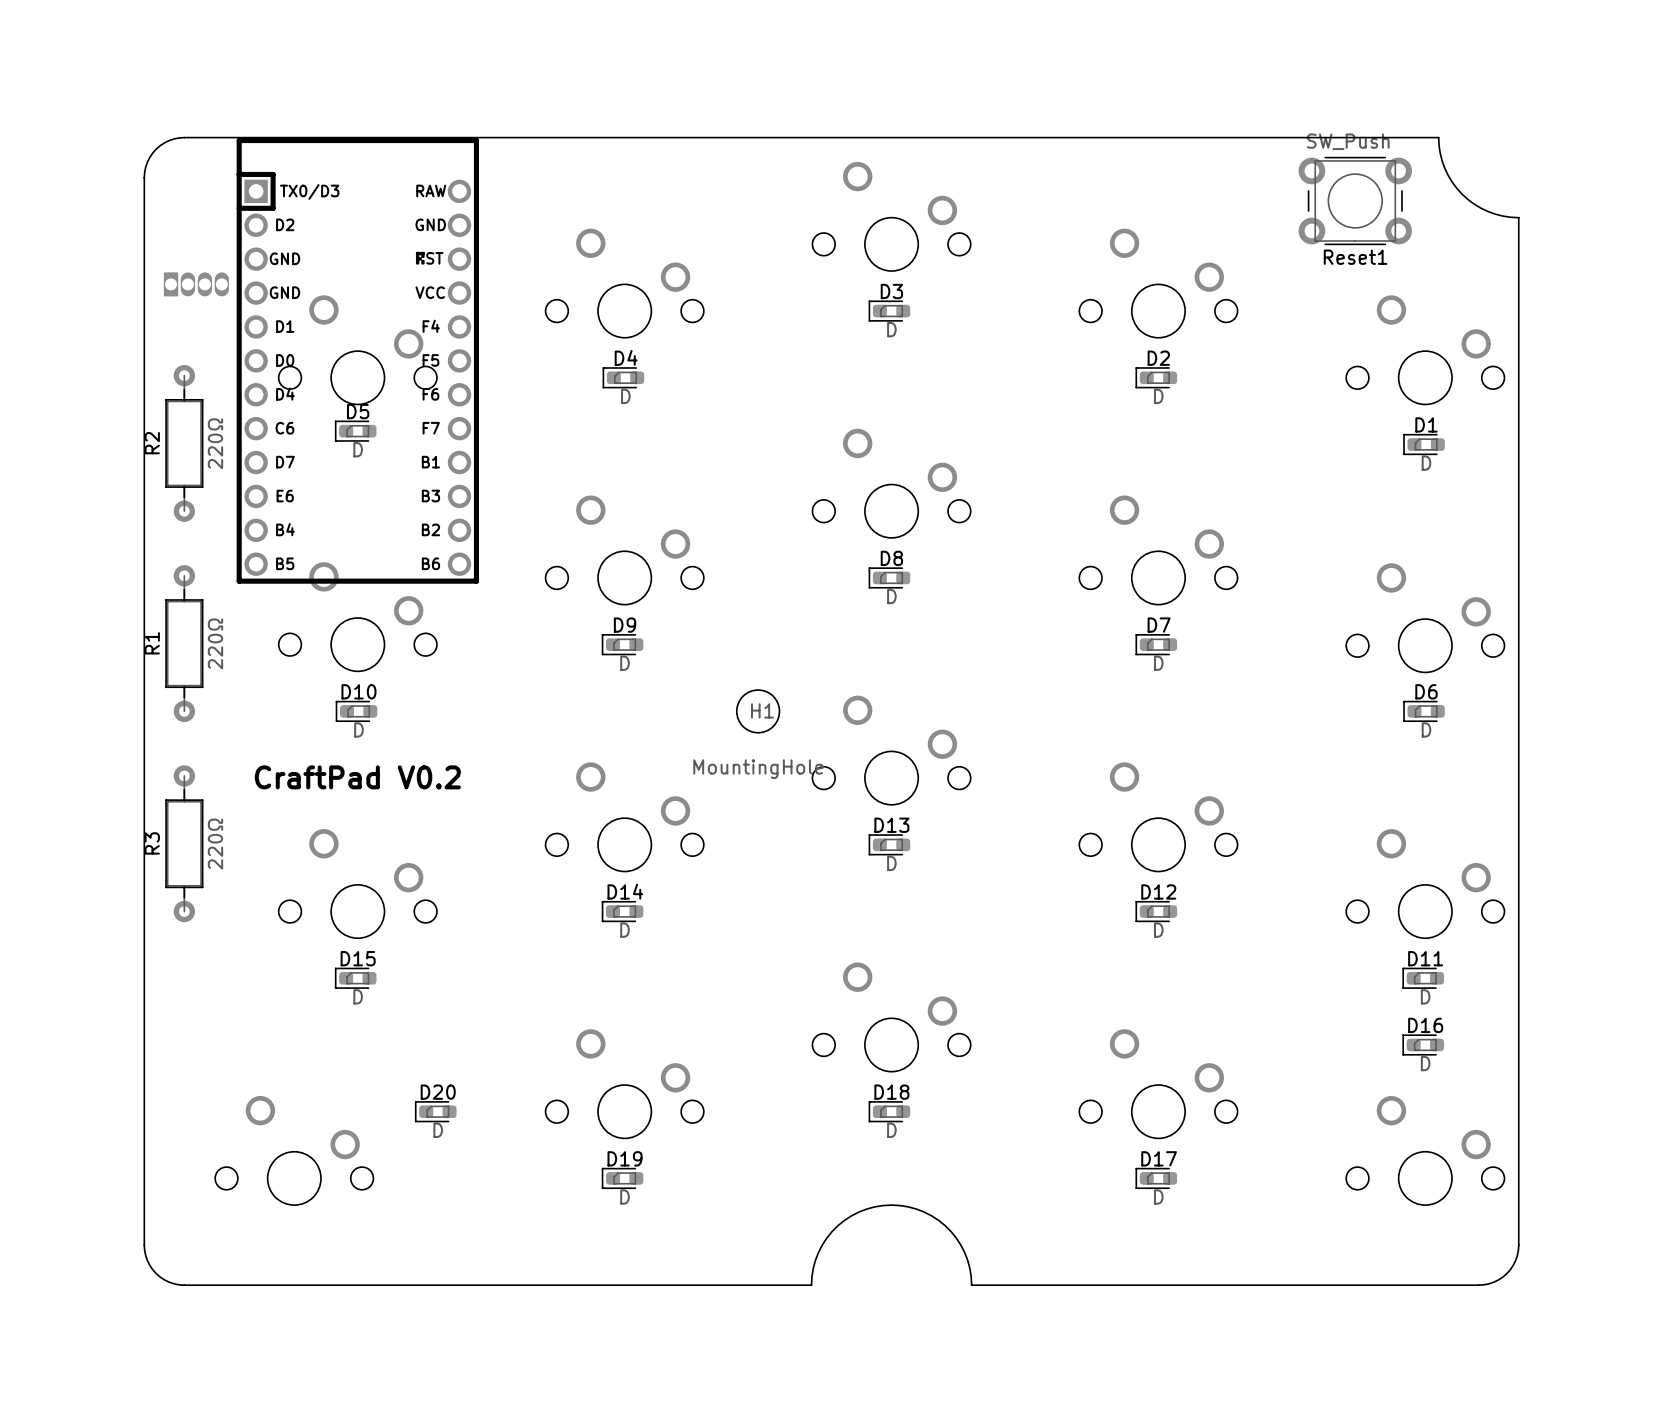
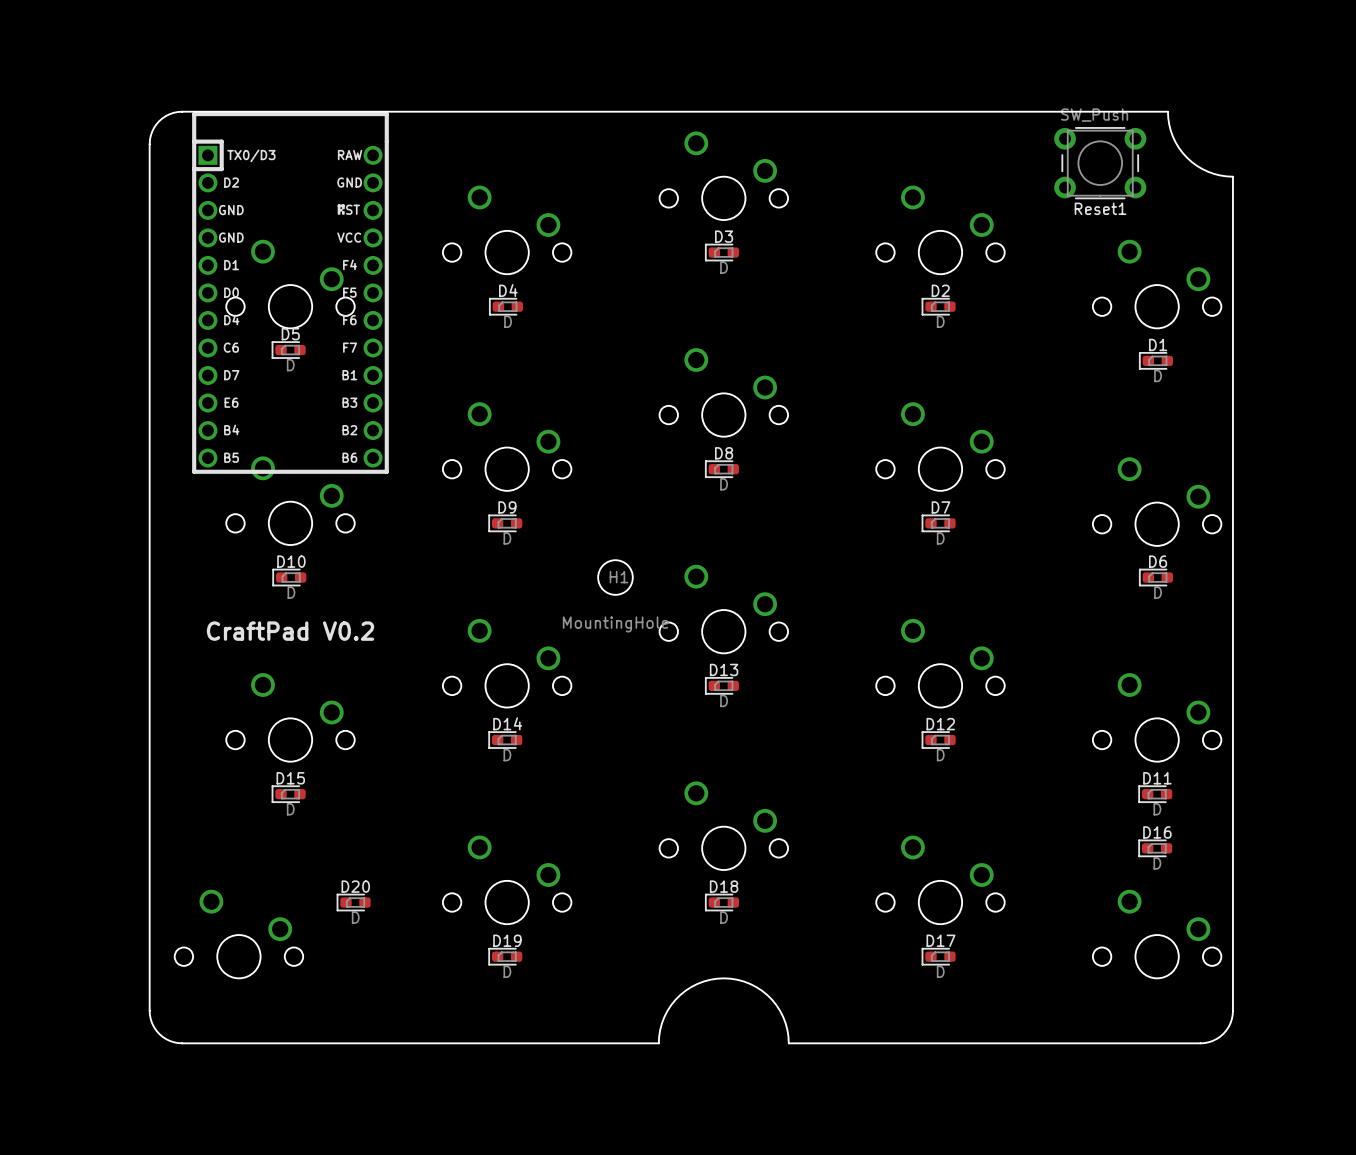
board edge: (224, 137) (179, 137) (164, 142) (149, 157) (144, 177) (144, 1250) (152, 1269) (169, 1282) (184, 1285) (224, 1285) -> (182, 111) (169, 114) (159, 121) (152, 131) (149, 144) (149, 1010) (152, 1023) (159, 1033) (169, 1040) (182, 1043)
part: (196, 284) -> none
R2: 220Ω (184, 443) -> none
R1: 220Ω (184, 643) -> none
R3: 220Ω (184, 843) -> none

